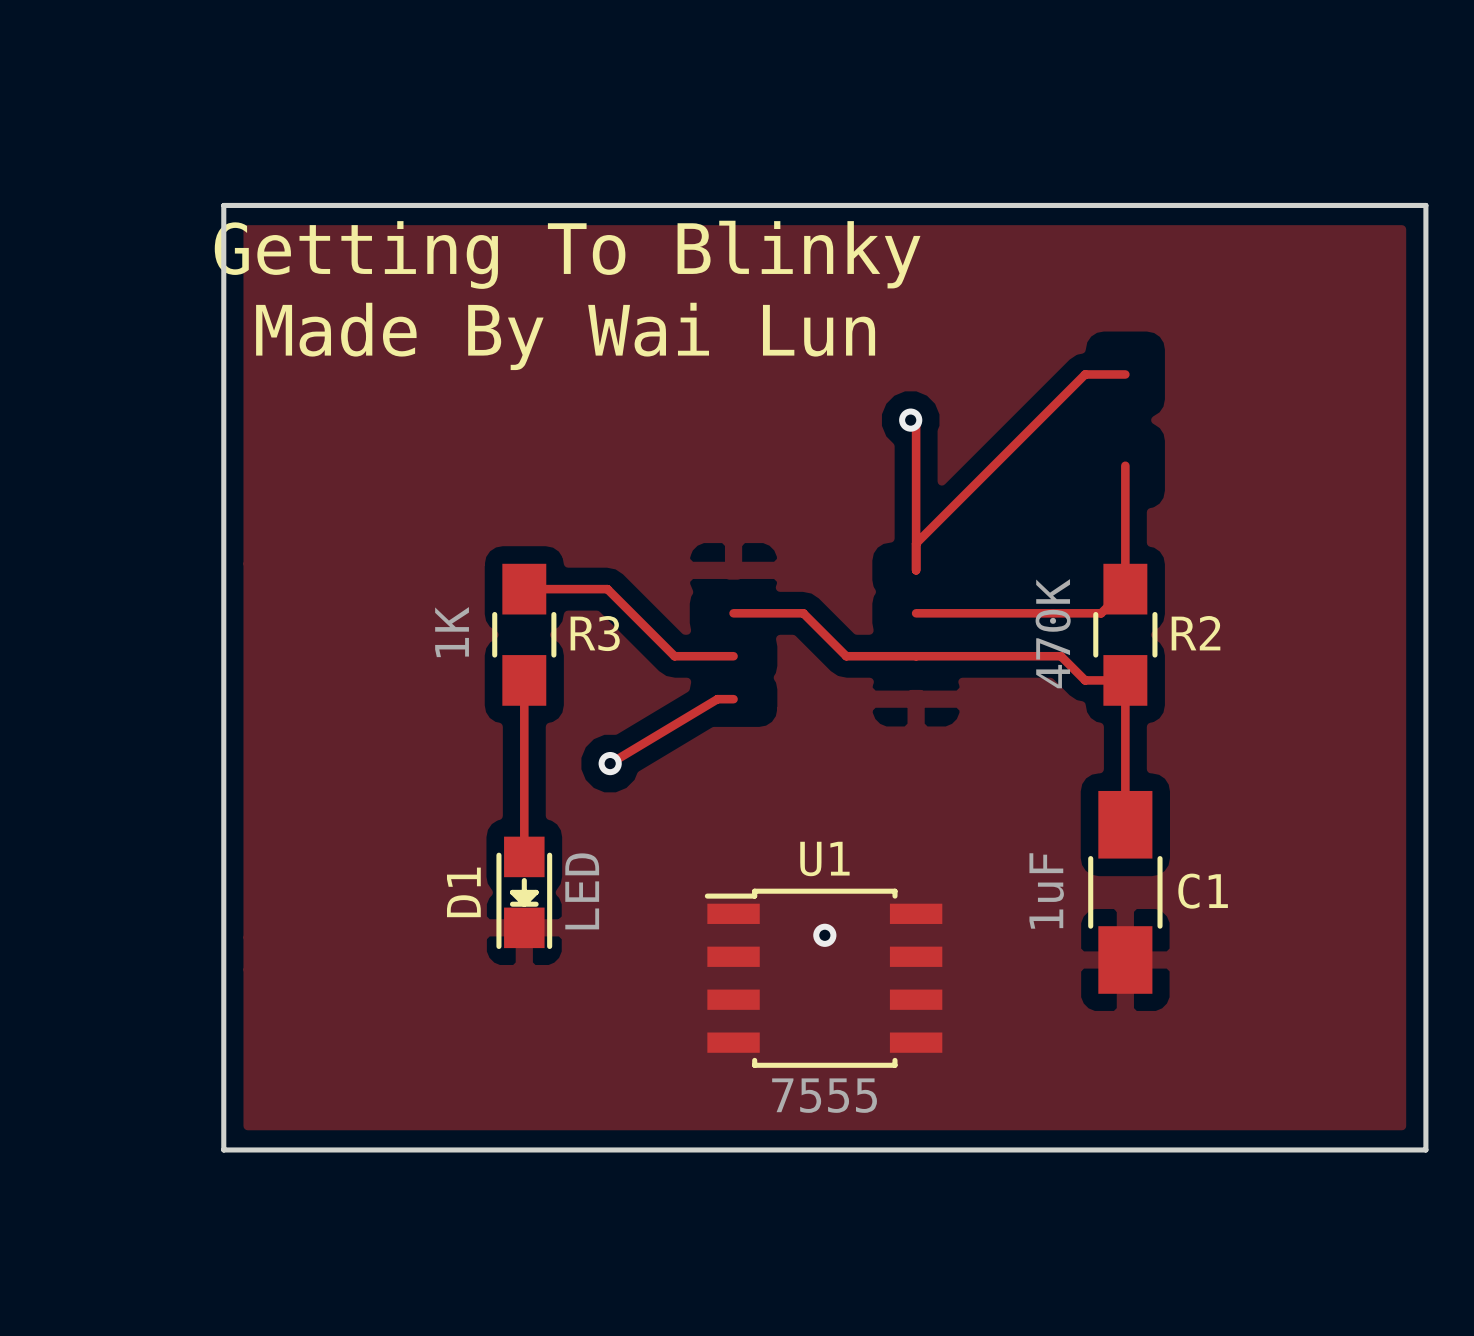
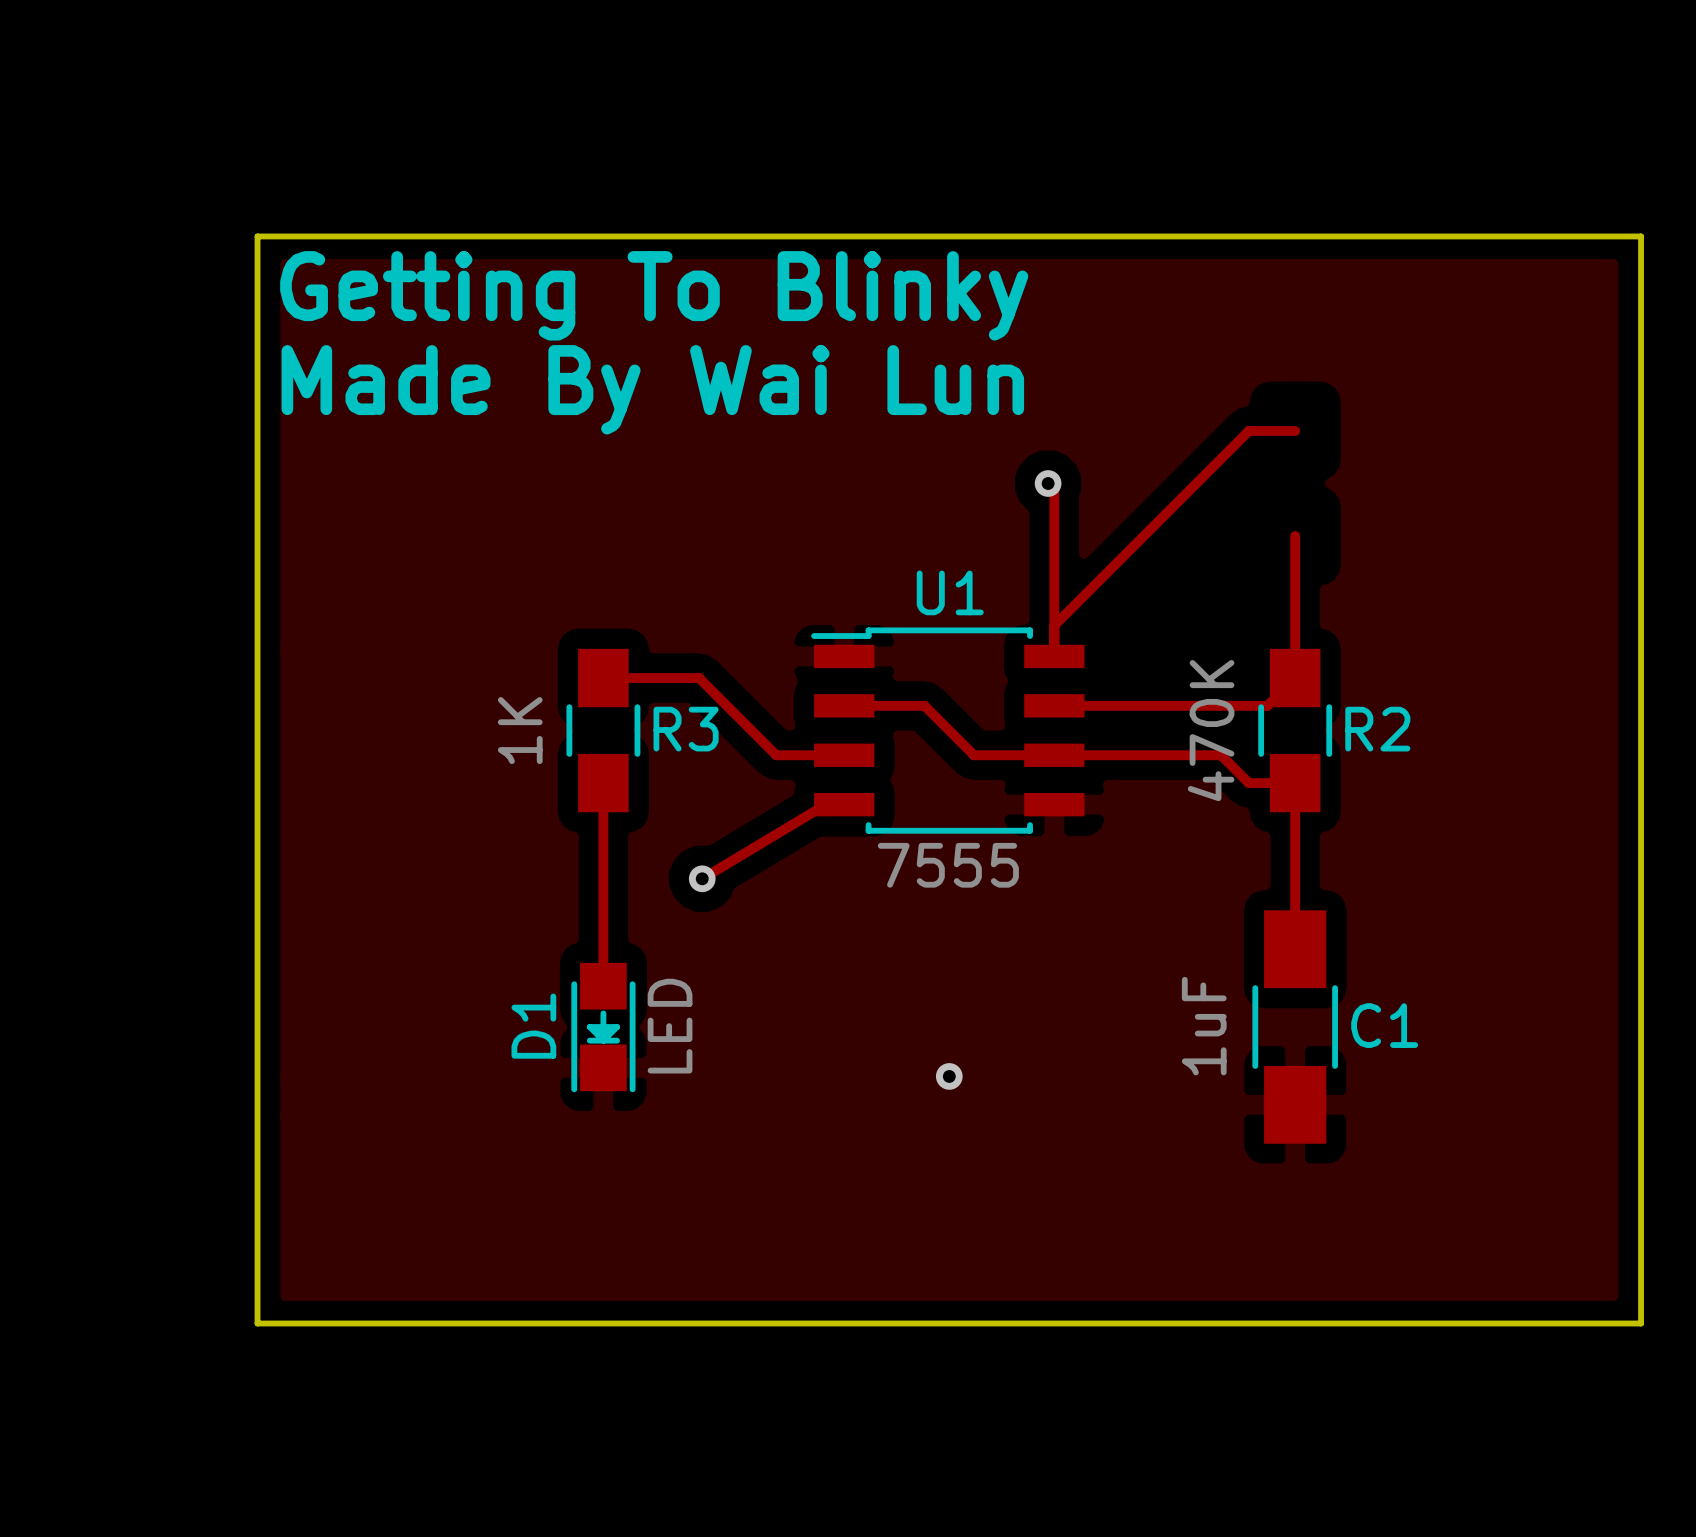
U1 position: (823, 978) -> (947, 730)

